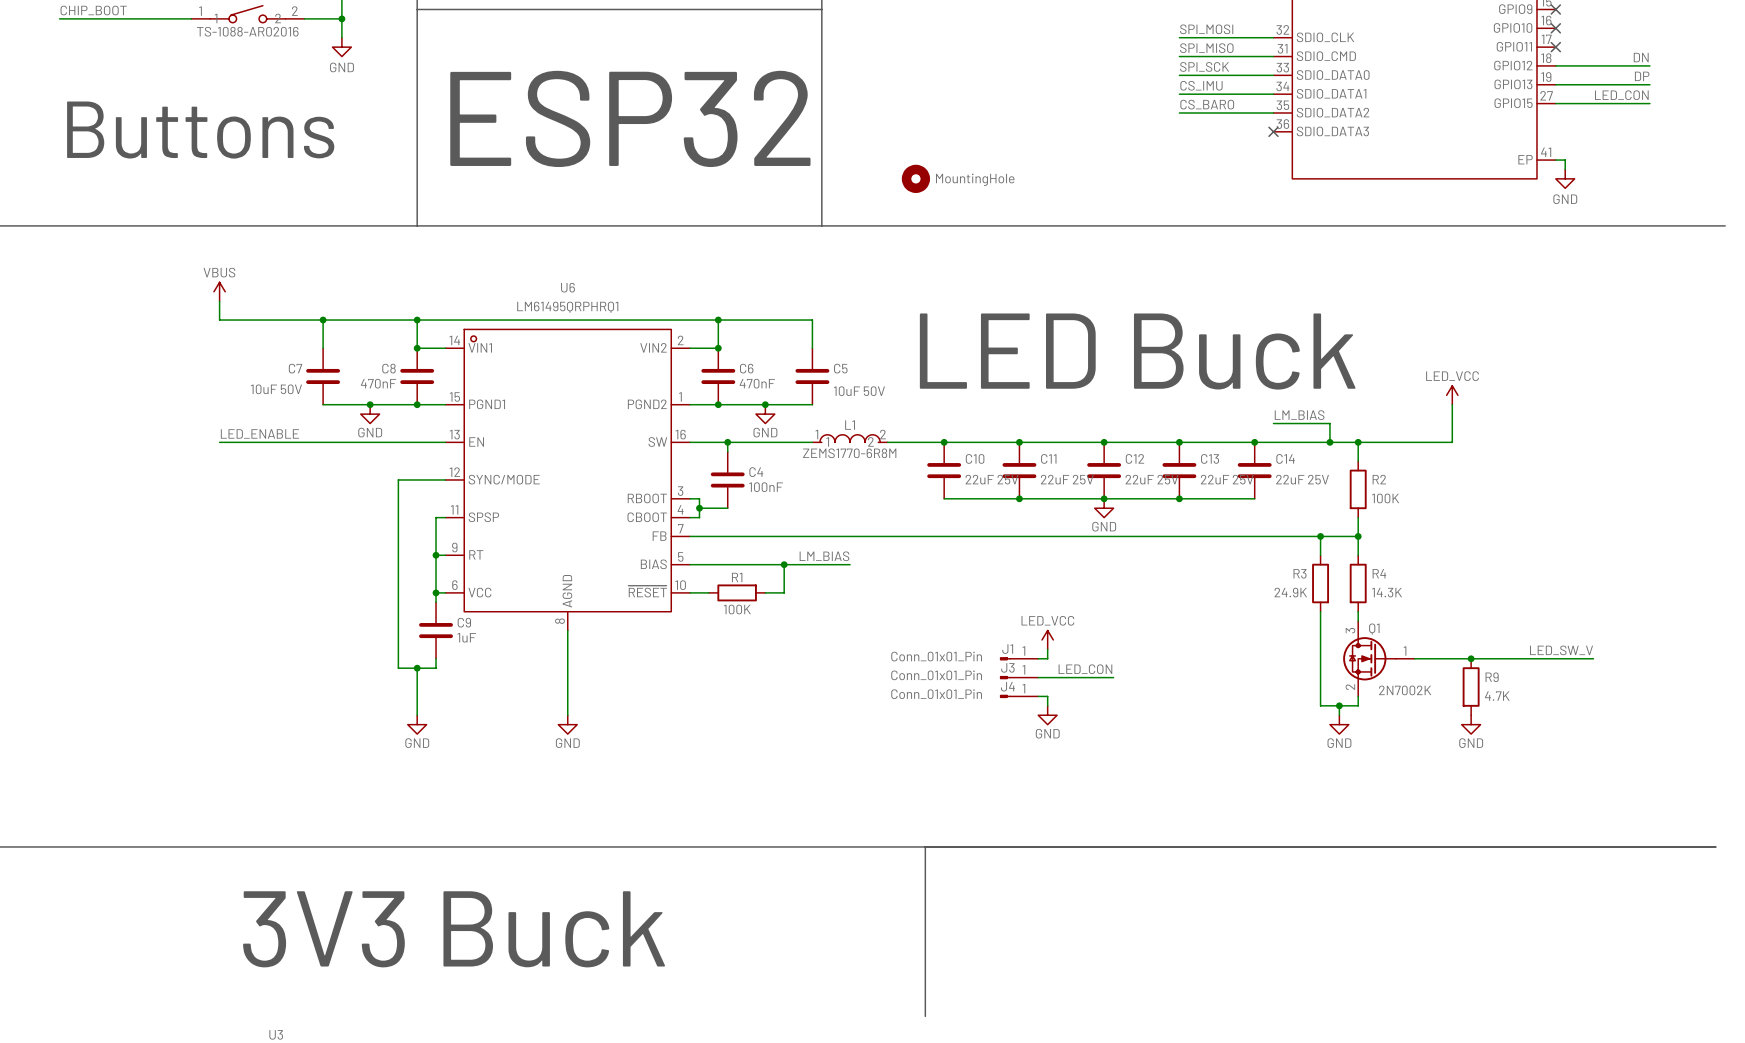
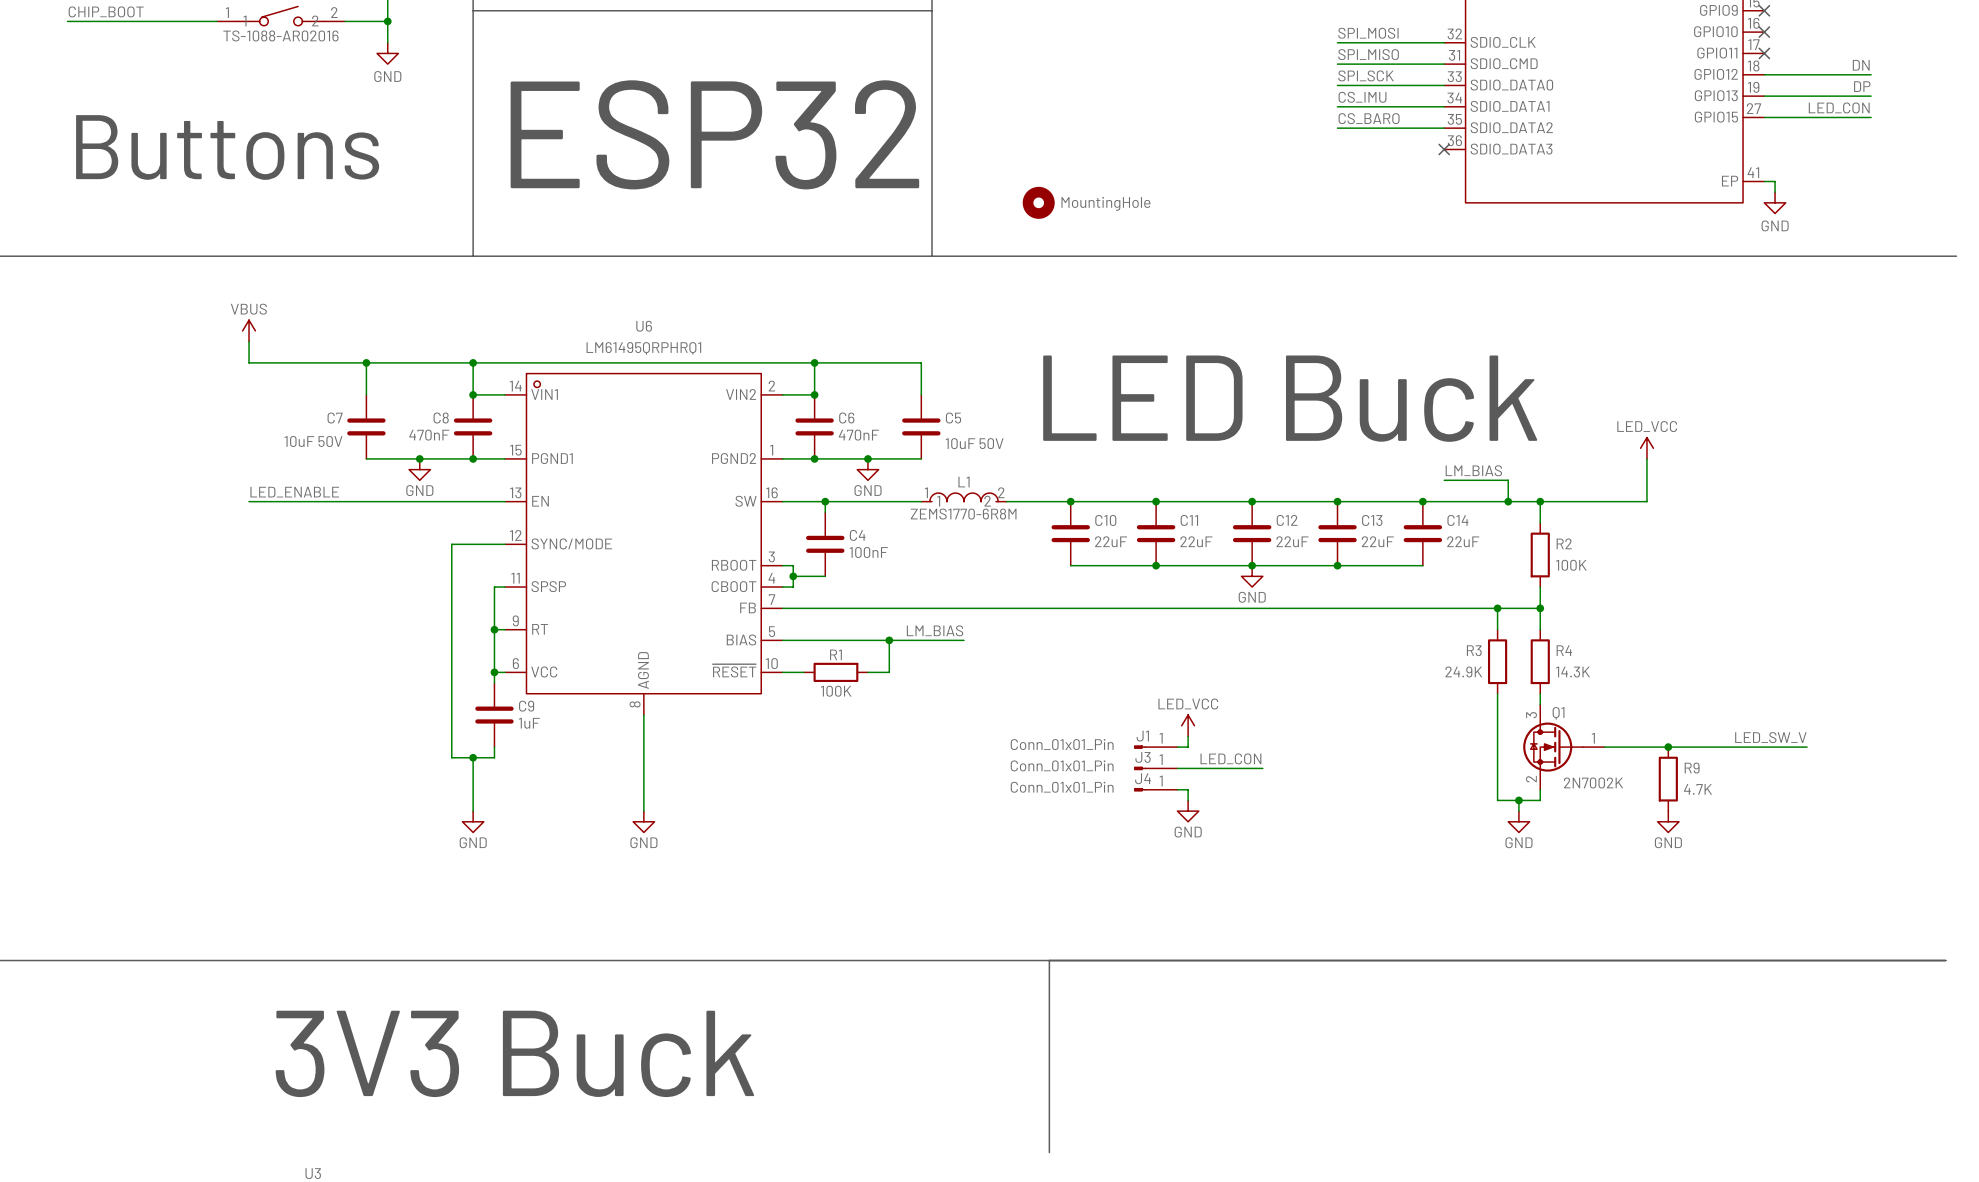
C10 value: 22uF 25V (992, 479) -> 22uF (1111, 541)
C11 value: 22uF 25V (1067, 479) -> 22uF (1196, 541)
C12 value: 22uF 25V (1151, 479) -> 22uF (1292, 541)
C13 value: 22uF 25V (1227, 479) -> 22uF (1377, 541)
C14 value: 22uF 25V (1302, 479) -> 22uF (1463, 541)

